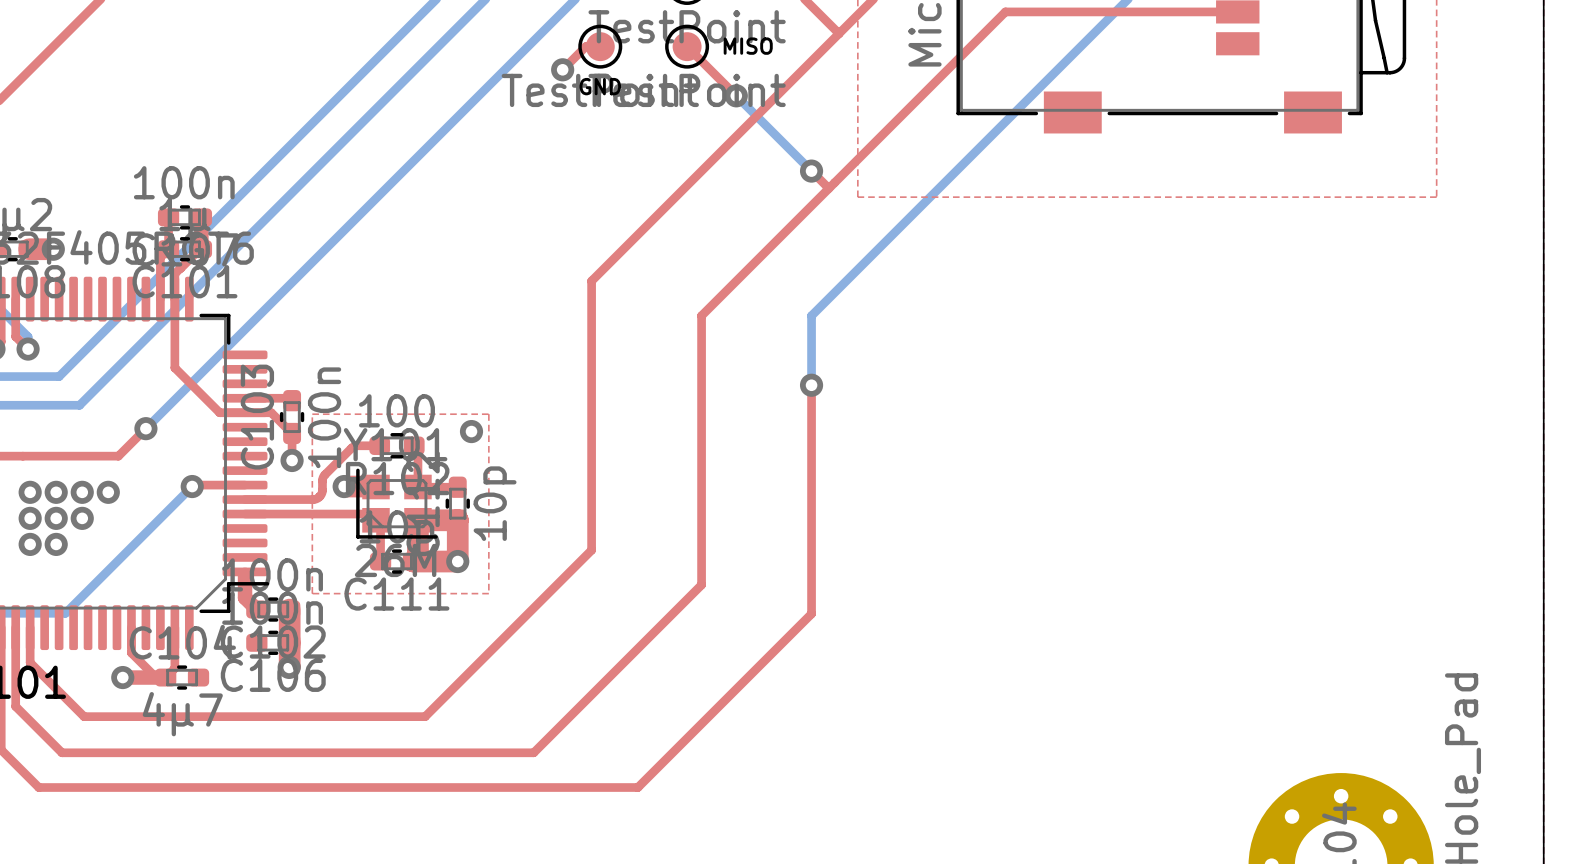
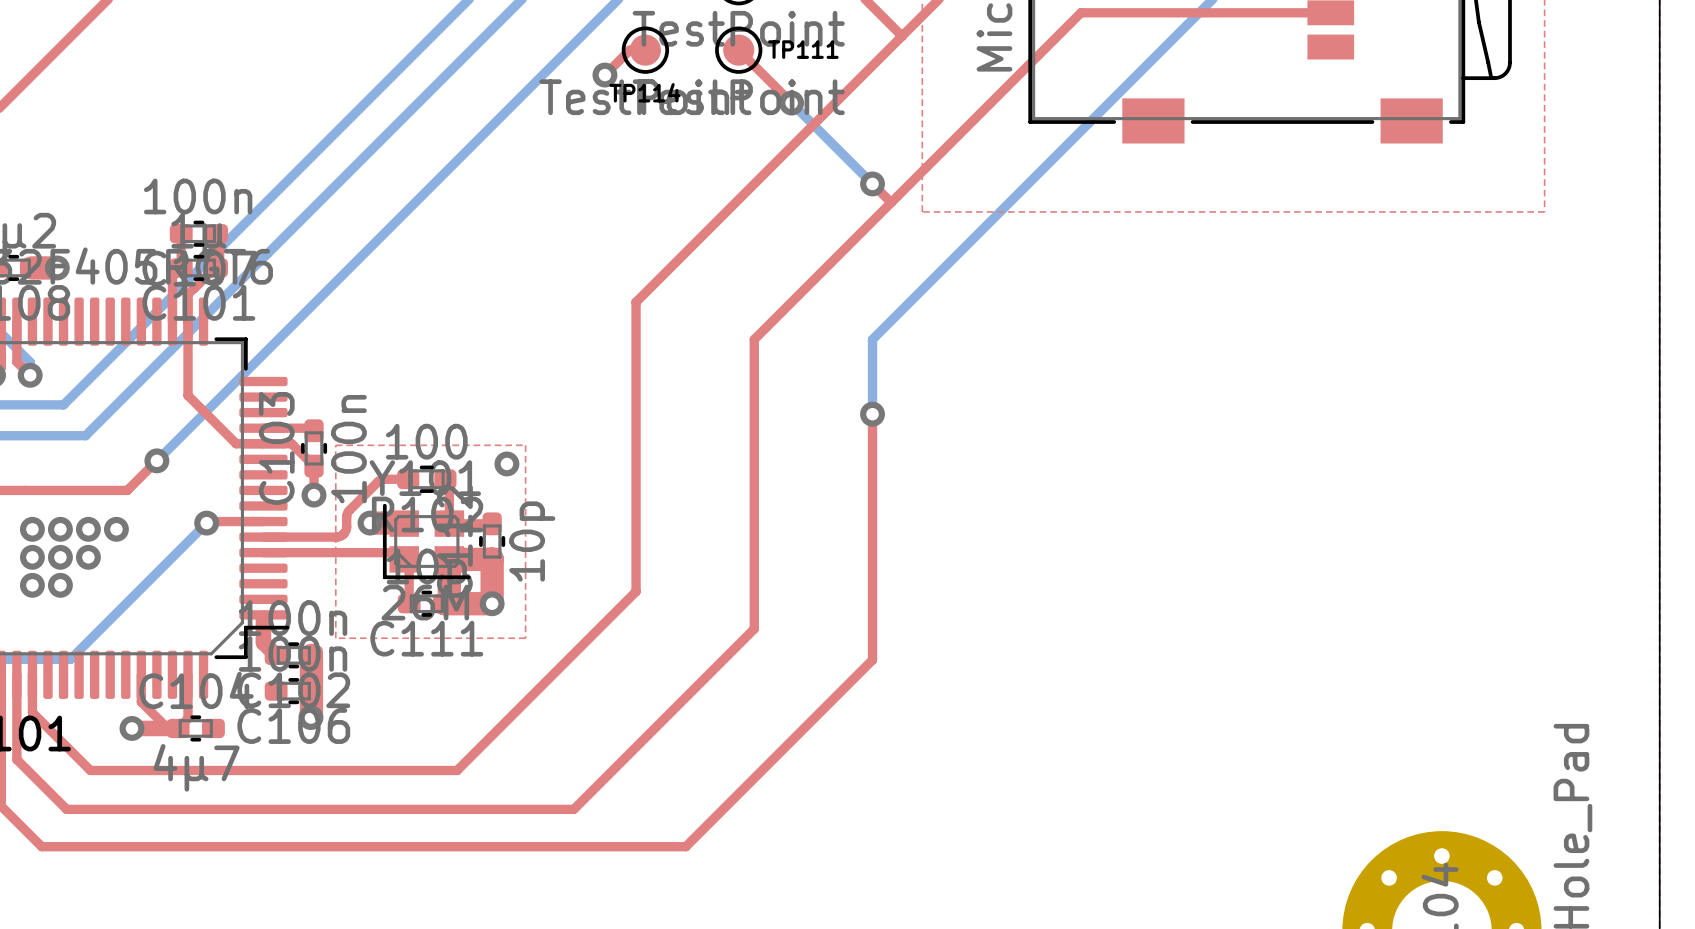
MISO name: MISO (748, 46) -> TP111 (803, 49)
GND name: GND (600, 86) -> TP114 (645, 92)

